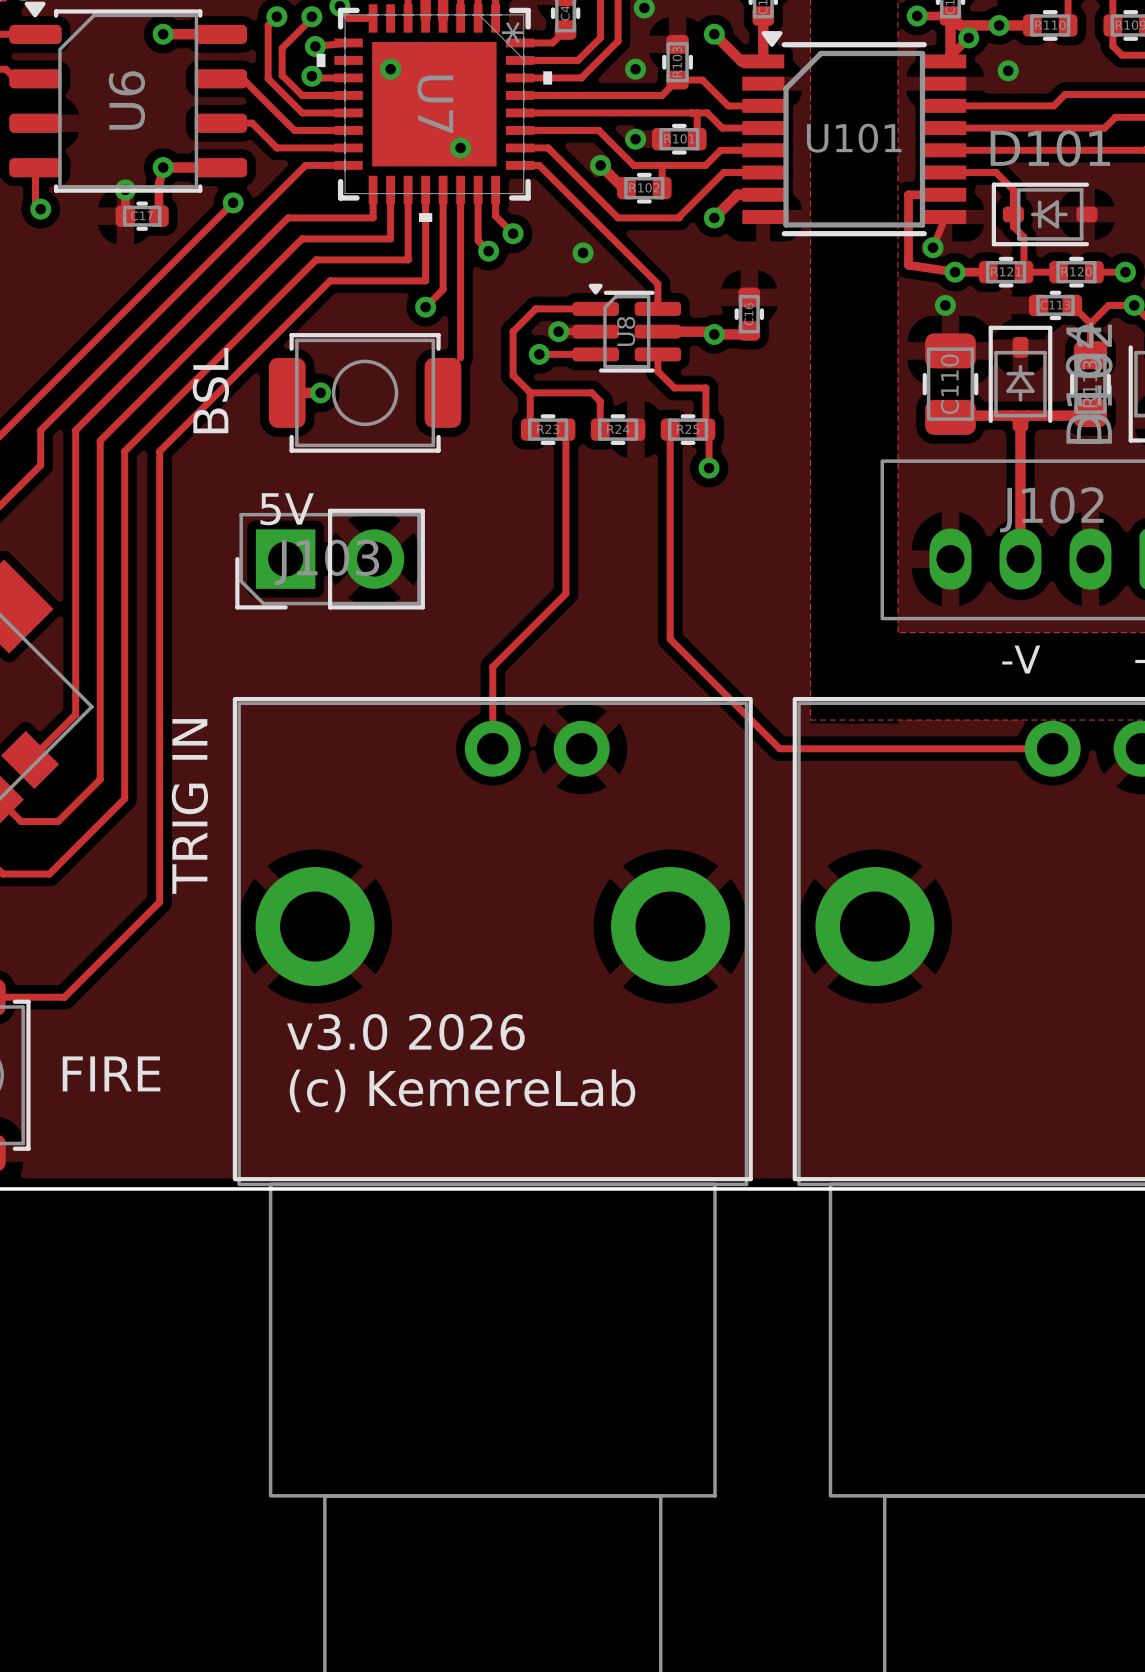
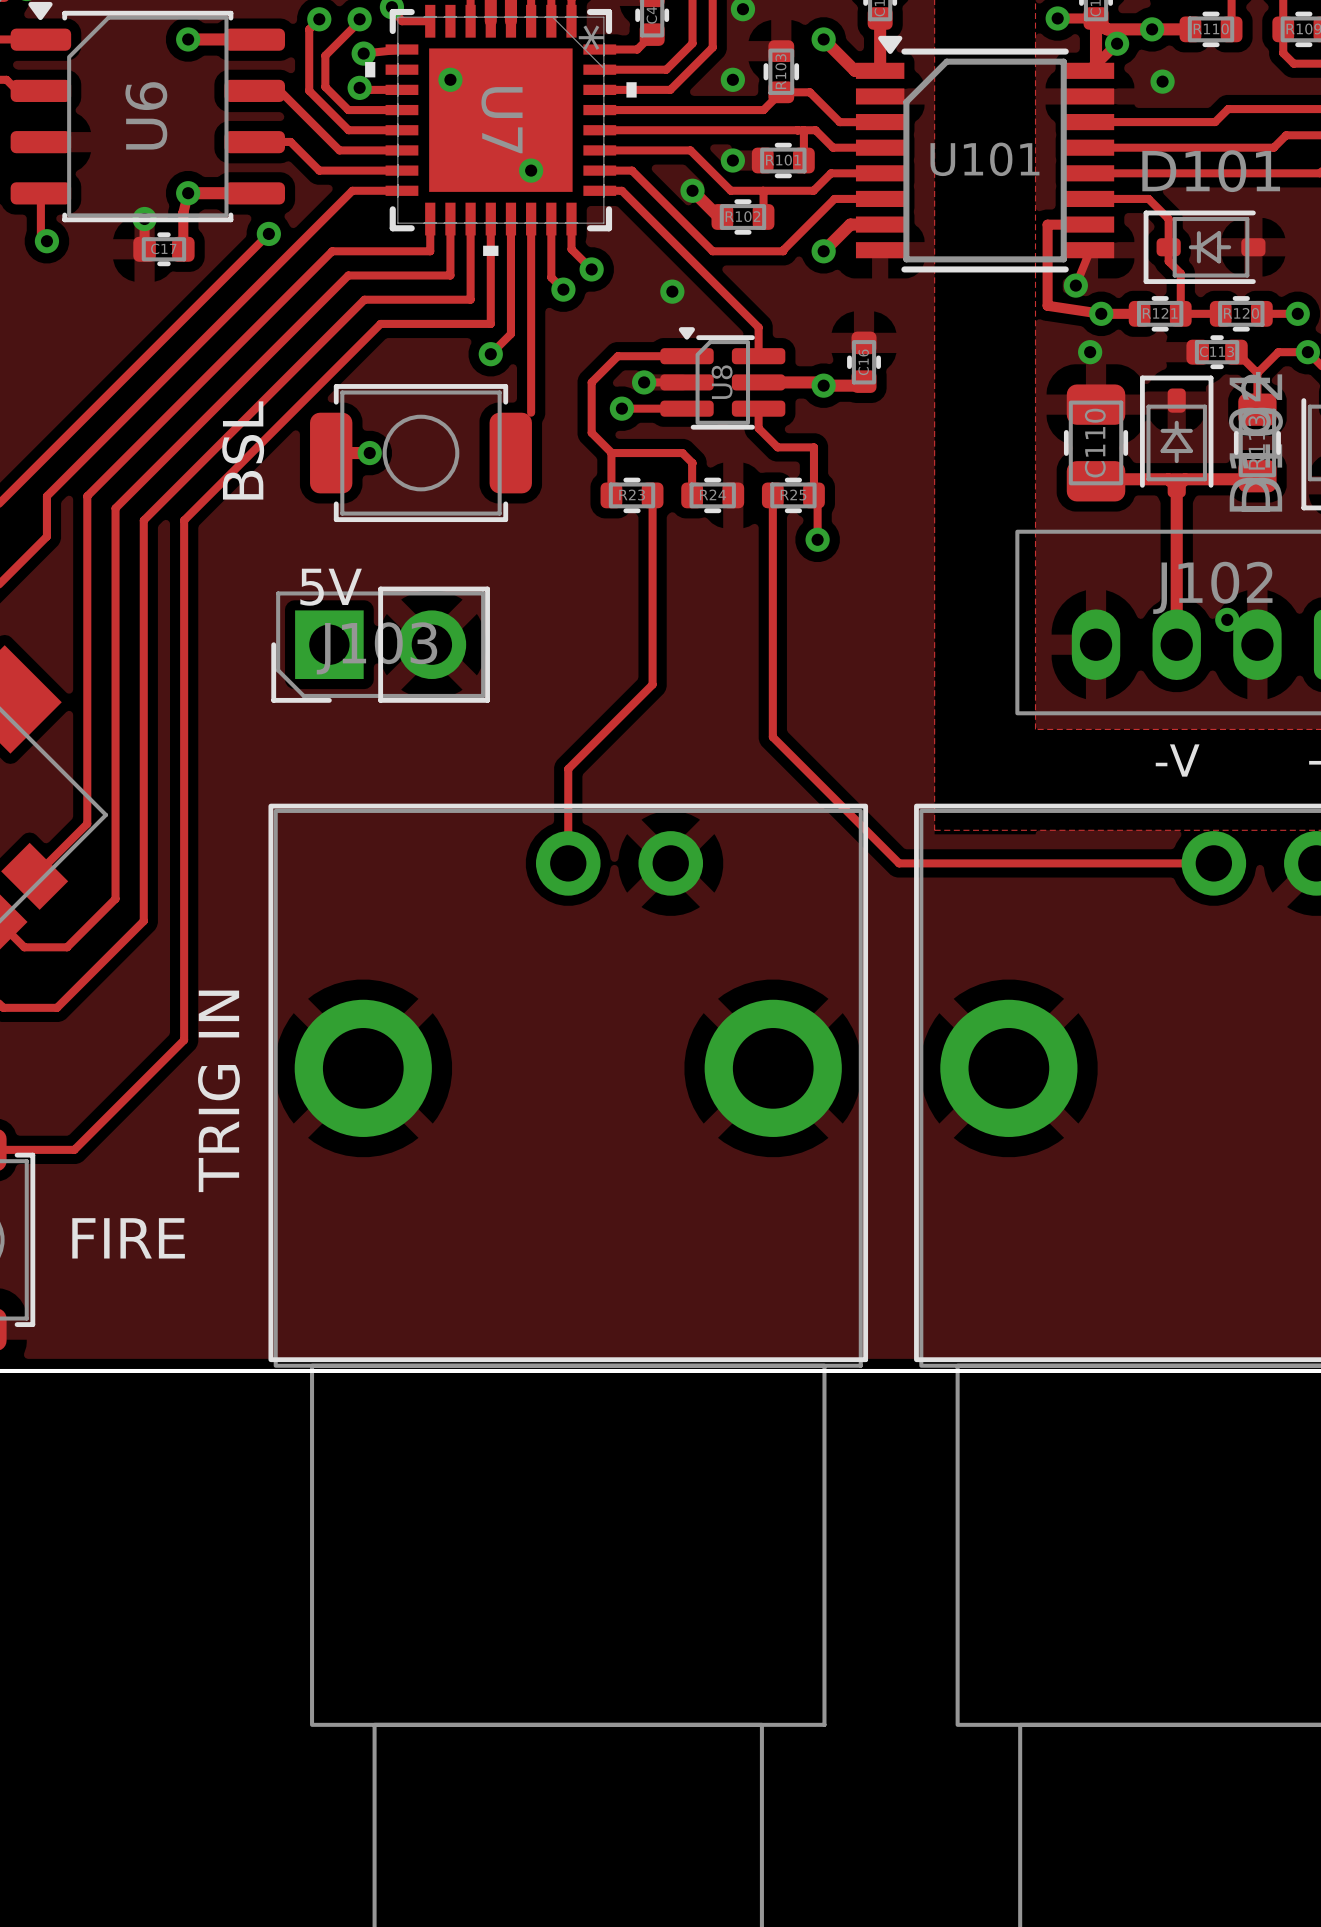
via: none -> (1227, 619)
text position: TRIG IN (189, 806) -> TRIG IN (218, 1091)
text: v3.0 2026 (405, 1032) -> none
text: (c) KemereLab (462, 1090) -> none

